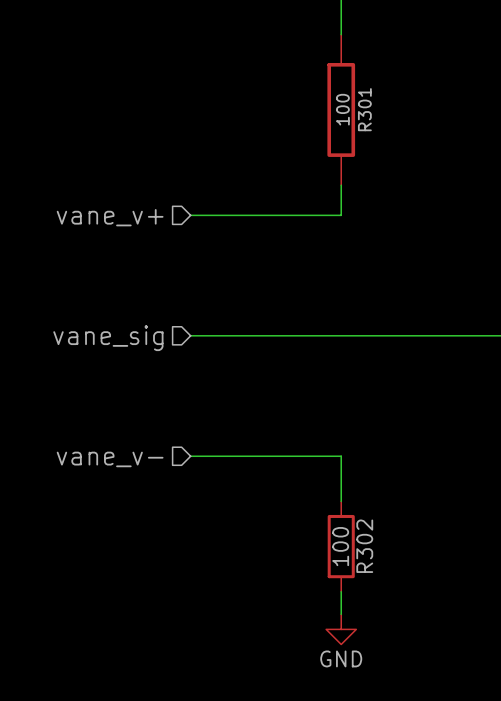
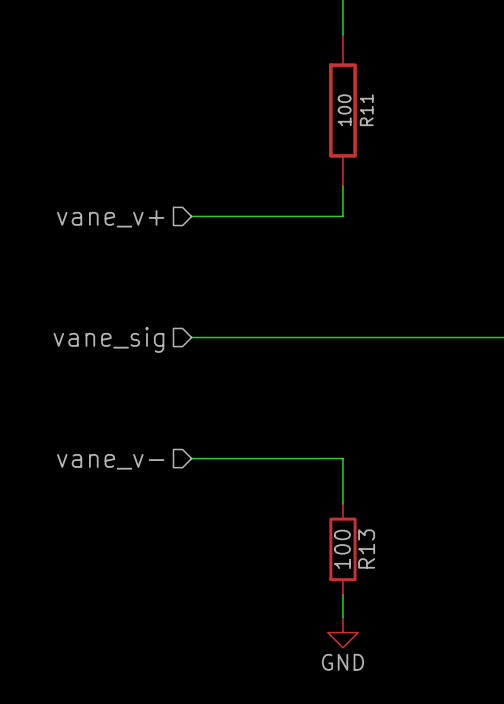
R301 name: R301 (364, 109) -> R11 (366, 110)
R302 name: R302 (364, 546) -> R13 (366, 549)

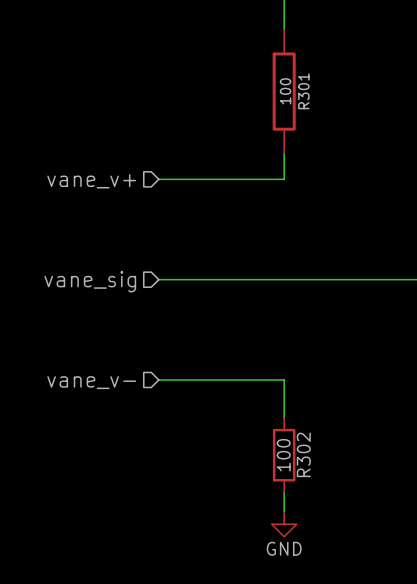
R11 name: R11 (366, 110) -> R301 (303, 91)
R13 name: R13 (366, 549) -> R302 (303, 454)

